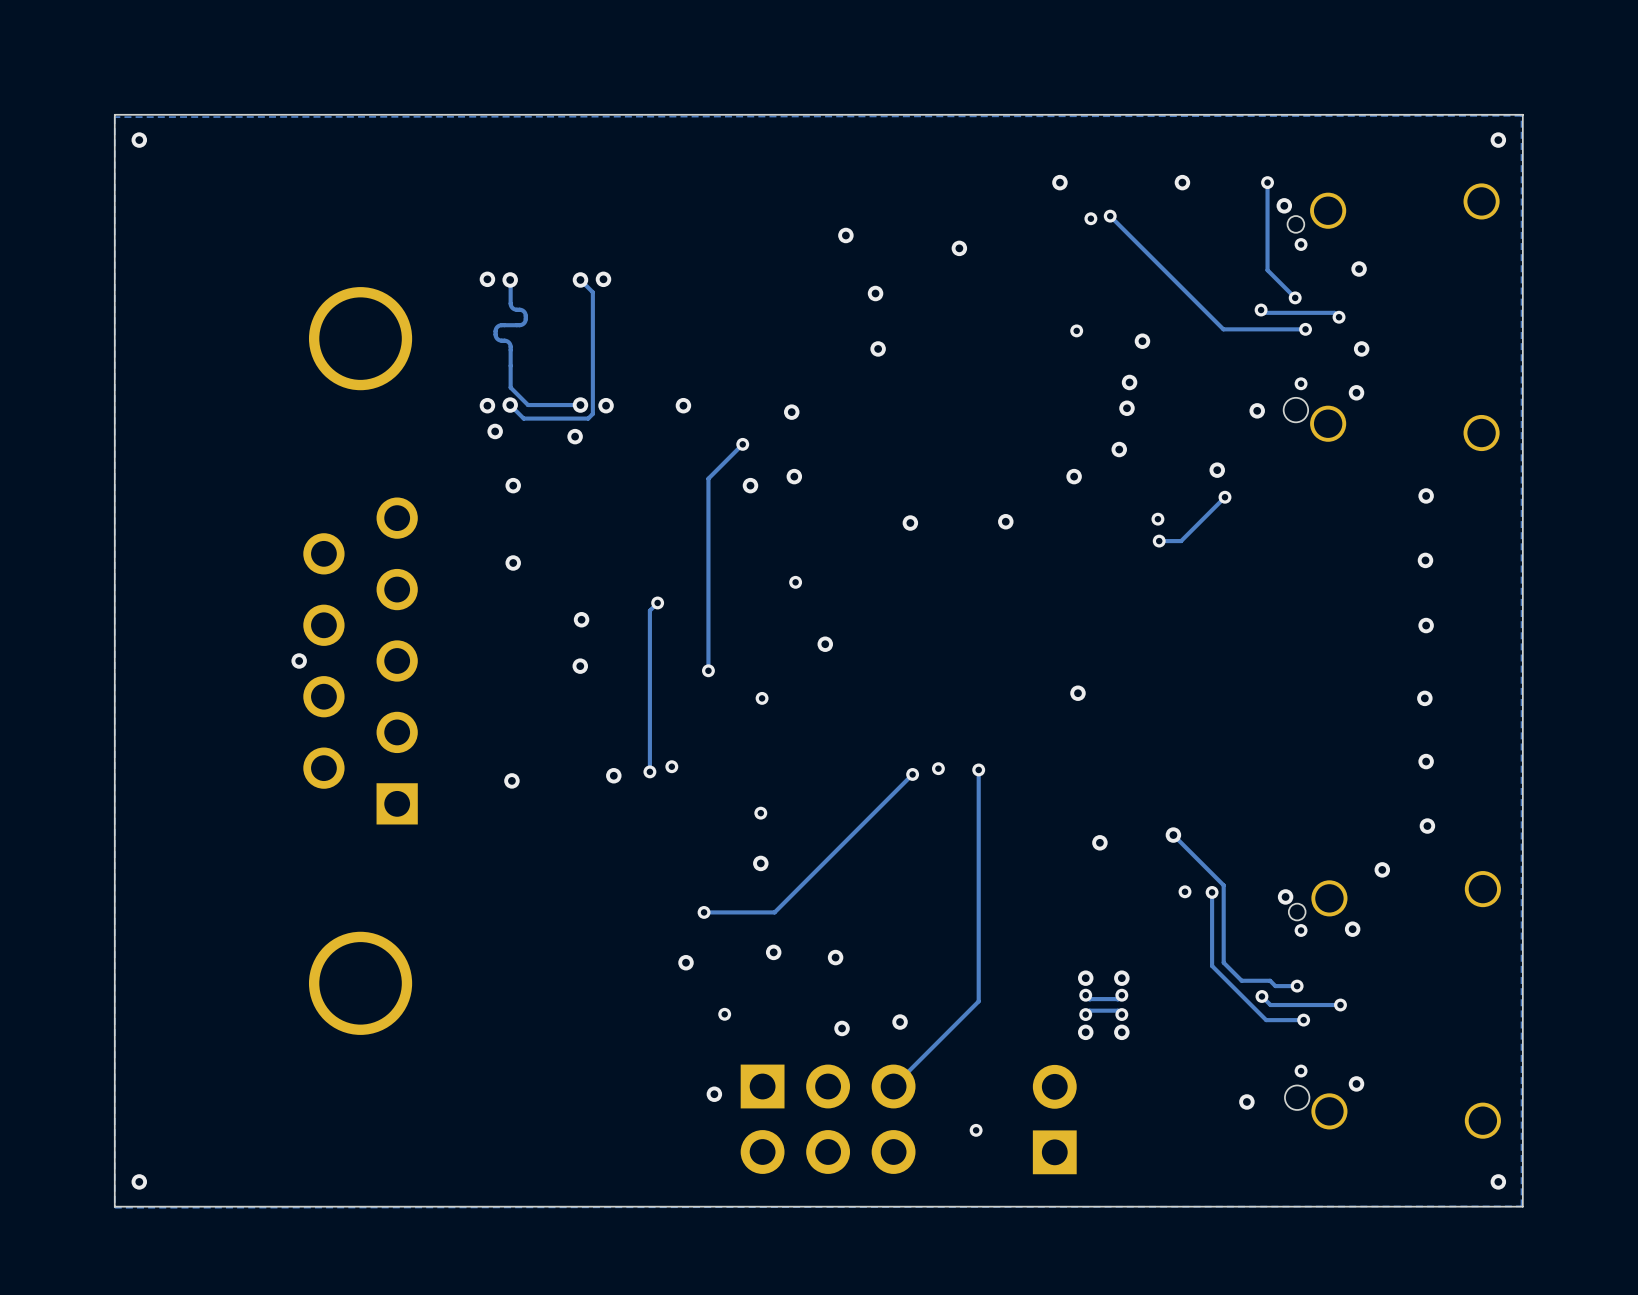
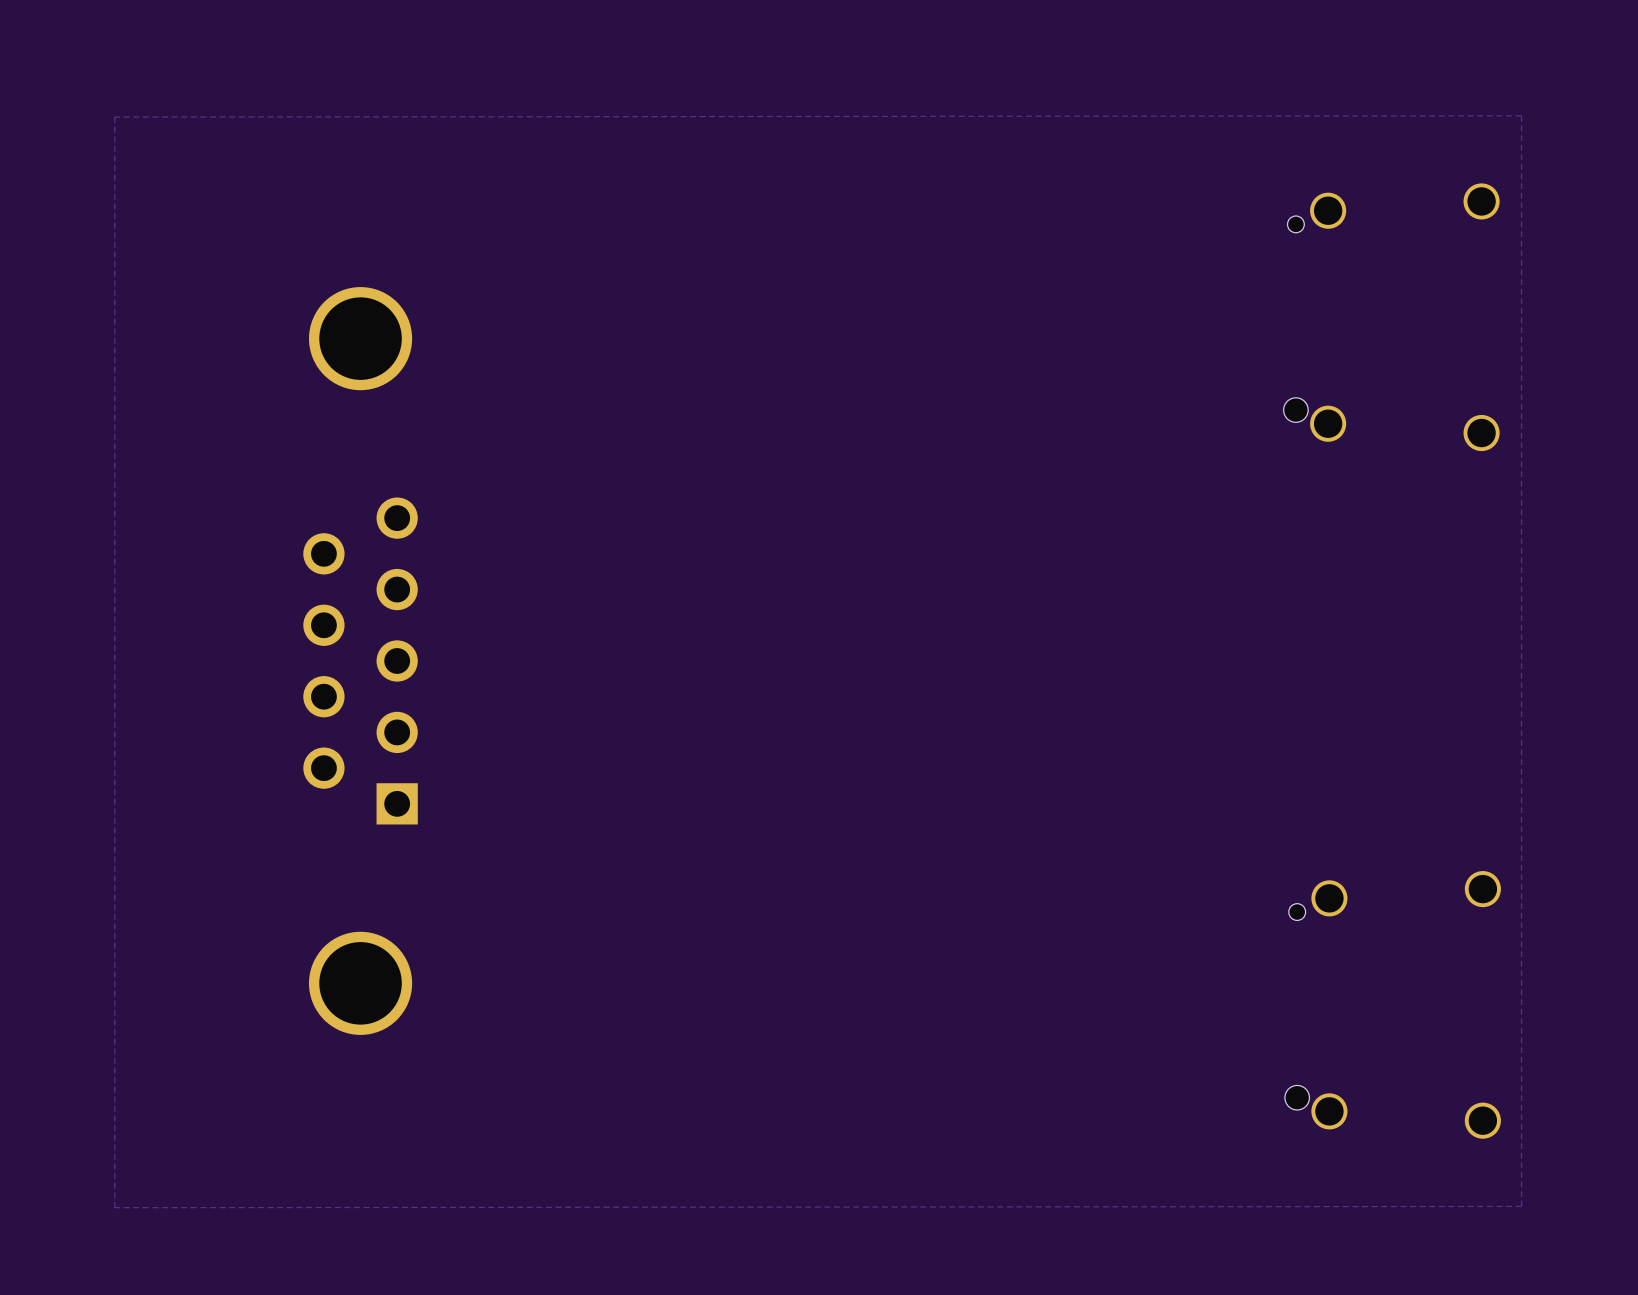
board edge: (1522, 114) (114, 114) (114, 1206) (1522, 1206) (1522, 114) -> none
via: (139, 140) -> none
via: (1498, 140) -> none
via: (1059, 182) -> none
via: (1182, 182) -> none
track: (1267, 182) (1267, 270) (1295, 297) (1297, 297) -> none
via: (1267, 182) -> none
via: (1284, 205) -> none
track: (1110, 216) (1223, 329) (1306, 329) -> none
via: (1110, 216) -> none
via: (1090, 218) -> none
via: (845, 235) -> none
via: (1301, 244) -> none
via: (959, 248) -> none
via: (1359, 269) -> none
via: (487, 279) -> none
track: (510, 279) (511, 306) (514, 309) (522, 310) (525, 315) (525, 321) (522, 324) (500, 325) (495, 330) (497, 338) (507, 341) (510, 345) (510, 387) (528, 405) (580, 405) -> none
via: (510, 279) -> none
track: (580, 279) (592, 292) (592, 413) (588, 418) (523, 418) (510, 405) -> none
via: (580, 279) -> none
via: (603, 279) -> none
via: (875, 293) -> none
via: (1295, 297) -> none
track: (1261, 310) (1263, 312) (1334, 312) (1339, 317) -> none
via: (1261, 310) -> none
via: (1339, 317) -> none
via: (1305, 329) -> none
via: (1076, 330) -> none
via: (1142, 341) -> none
via: (878, 348) -> none
via: (1361, 348) -> none
via: (1129, 382) -> none
via: (1301, 383) -> none
via: (1356, 392) -> none
via: (487, 405) -> none
via: (510, 405) -> none
via: (580, 405) -> none
via: (606, 405) -> none
via: (683, 405) -> none
via: (1126, 408) -> none
via: (1257, 410) -> none
via: (791, 412) -> none
via: (495, 431) -> none
via: (575, 436) -> none
track: (742, 444) (708, 478) (708, 670) -> none
via: (742, 444) -> none
via: (1119, 449) -> none
via: (1217, 470) -> none
via: (794, 476) -> none
via: (1074, 476) -> none
via: (513, 485) -> none
via: (750, 485) -> none
via: (1426, 495) -> none
track: (1224, 497) (1181, 541) (1159, 541) -> none
via: (1224, 497) -> none
via: (1157, 519) -> none
via: (1005, 521) -> none
via: (910, 523) -> none
via: (1159, 541) -> none
via: (1425, 560) -> none
via: (513, 562) -> none
via: (795, 582) -> none
track: (657, 602) (649, 610) (649, 771) -> none
via: (657, 602) -> none
via: (581, 619) -> none
via: (1426, 625) -> none
via: (825, 644) -> none
via: (299, 660) -> none
via: (580, 666) -> none
via: (708, 670) -> none
via: (1077, 693) -> none
via: (762, 698) -> none
via: (1424, 698) -> none
via: (1426, 761) -> none
via: (671, 766) -> none
via: (938, 768) -> none
track: (978, 769) (978, 1001) (893, 1086) -> none
via: (978, 769) -> none
via: (649, 771) -> none
track: (912, 774) (774, 912) (704, 912) -> none
via: (912, 774) -> none
via: (613, 775) -> none
via: (511, 780) -> none
via: (760, 813) -> none
via: (1427, 826) -> none
via: (1173, 835) -> none
track: (1174, 835) (1223, 885) (1223, 962) (1241, 980) (1270, 980) (1275, 986) (1297, 986) -> none
via: (1099, 842) -> none
via: (760, 863) -> none
via: (1382, 869) -> none
via: (1185, 891) -> none
track: (1212, 892) (1212, 965) (1266, 1020) (1303, 1020) -> none
via: (1212, 892) -> none
via: (1285, 896) -> none
via: (704, 912) -> none
via: (1352, 929) -> none
via: (1301, 930) -> none
via: (773, 952) -> none
via: (835, 957) -> none
via: (686, 962) -> none
via: (1085, 978) -> none
via: (1121, 978) -> none
via: (1297, 986) -> none
via: (1085, 995) -> none
track: (1121, 995) (1117, 999) (1089, 999) (1085, 995) -> none
via: (1121, 995) -> none
track: (1261, 996) (1270, 1005) (1340, 1005) -> none
via: (1261, 996) -> none
via: (1340, 1005) -> none
via: (724, 1014) -> none
via: (1085, 1014) -> none
track: (1121, 1014) (1117, 1010) (1089, 1010) (1085, 1014) -> none
via: (1121, 1014) -> none
via: (1303, 1020) -> none
via: (900, 1022) -> none
via: (842, 1028) -> none
via: (1085, 1032) -> none
via: (1121, 1032) -> none
via: (1301, 1071) -> none
via: (1356, 1083) -> none
via: (714, 1094) -> none
via: (1246, 1101) -> none
part: (828, 1119) -> none
part: (1054, 1119) -> none
via: (976, 1130) -> none
via: (139, 1181) -> none
via: (1498, 1181) -> none

